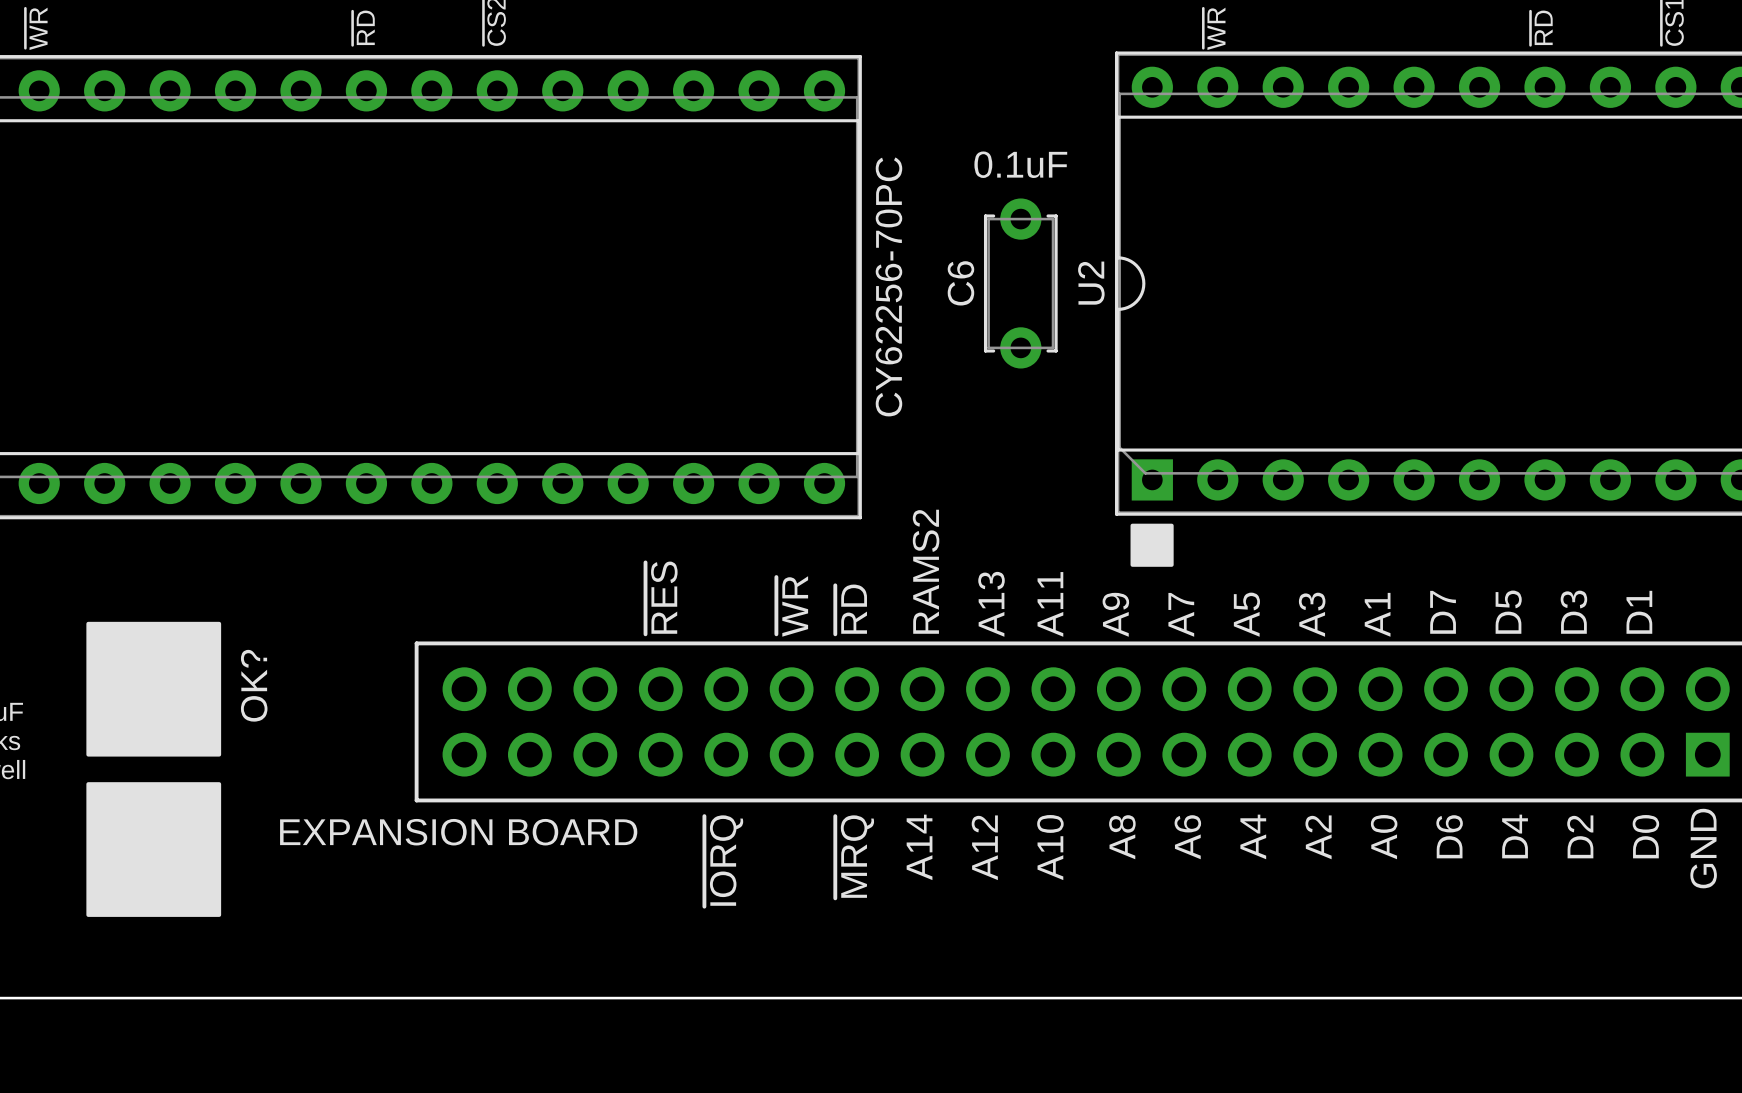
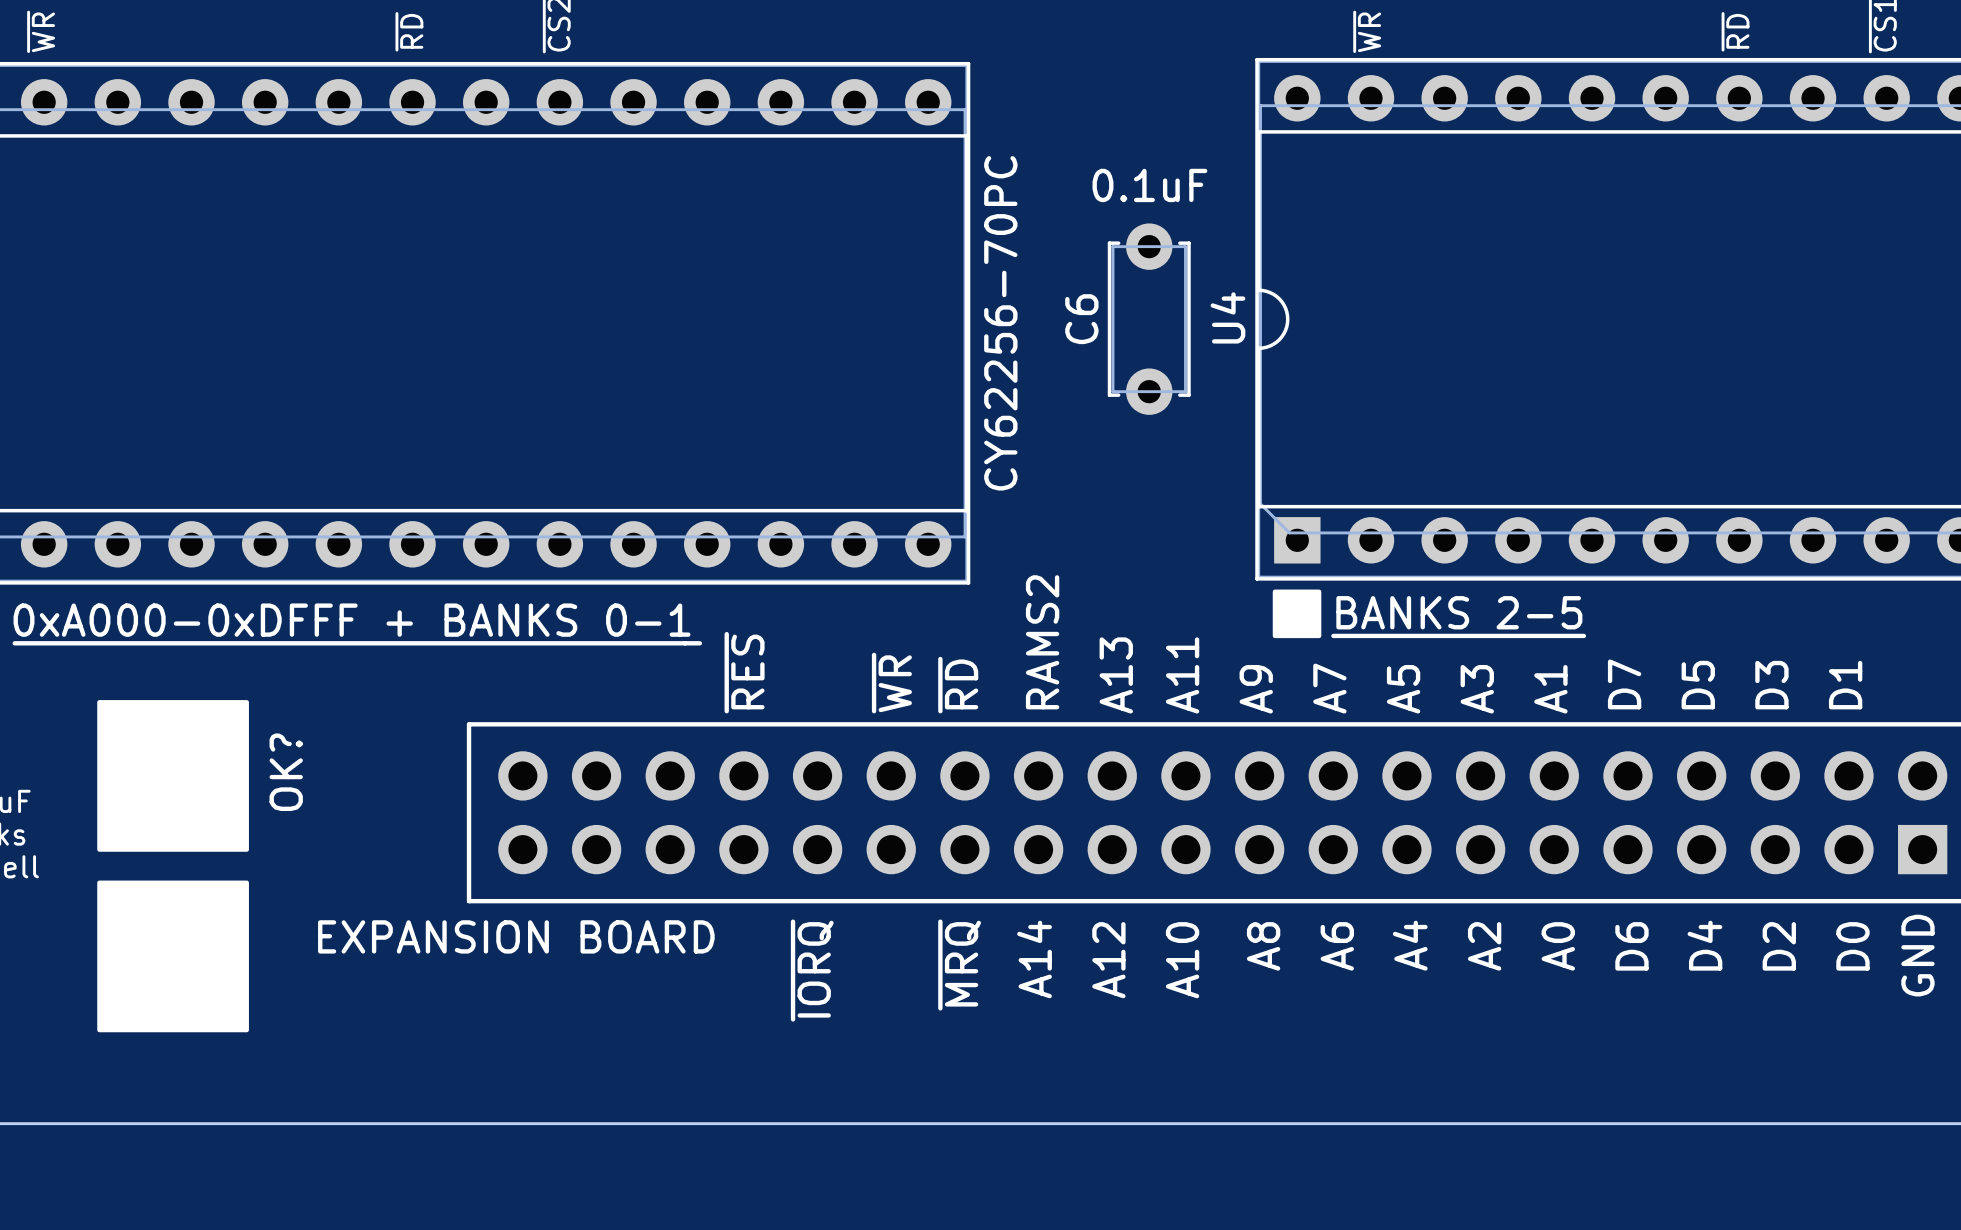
U2 name: U2 (1091, 283) -> U4 (1227, 317)
text: none -> BANKS 2-5 (1459, 612)
text: none -> 0xA000-0xDFFF + BANKS 0-1 (352, 620)
line: none -> (1333, 635) (1583, 635)
line: none -> (14, 643) (699, 643)

